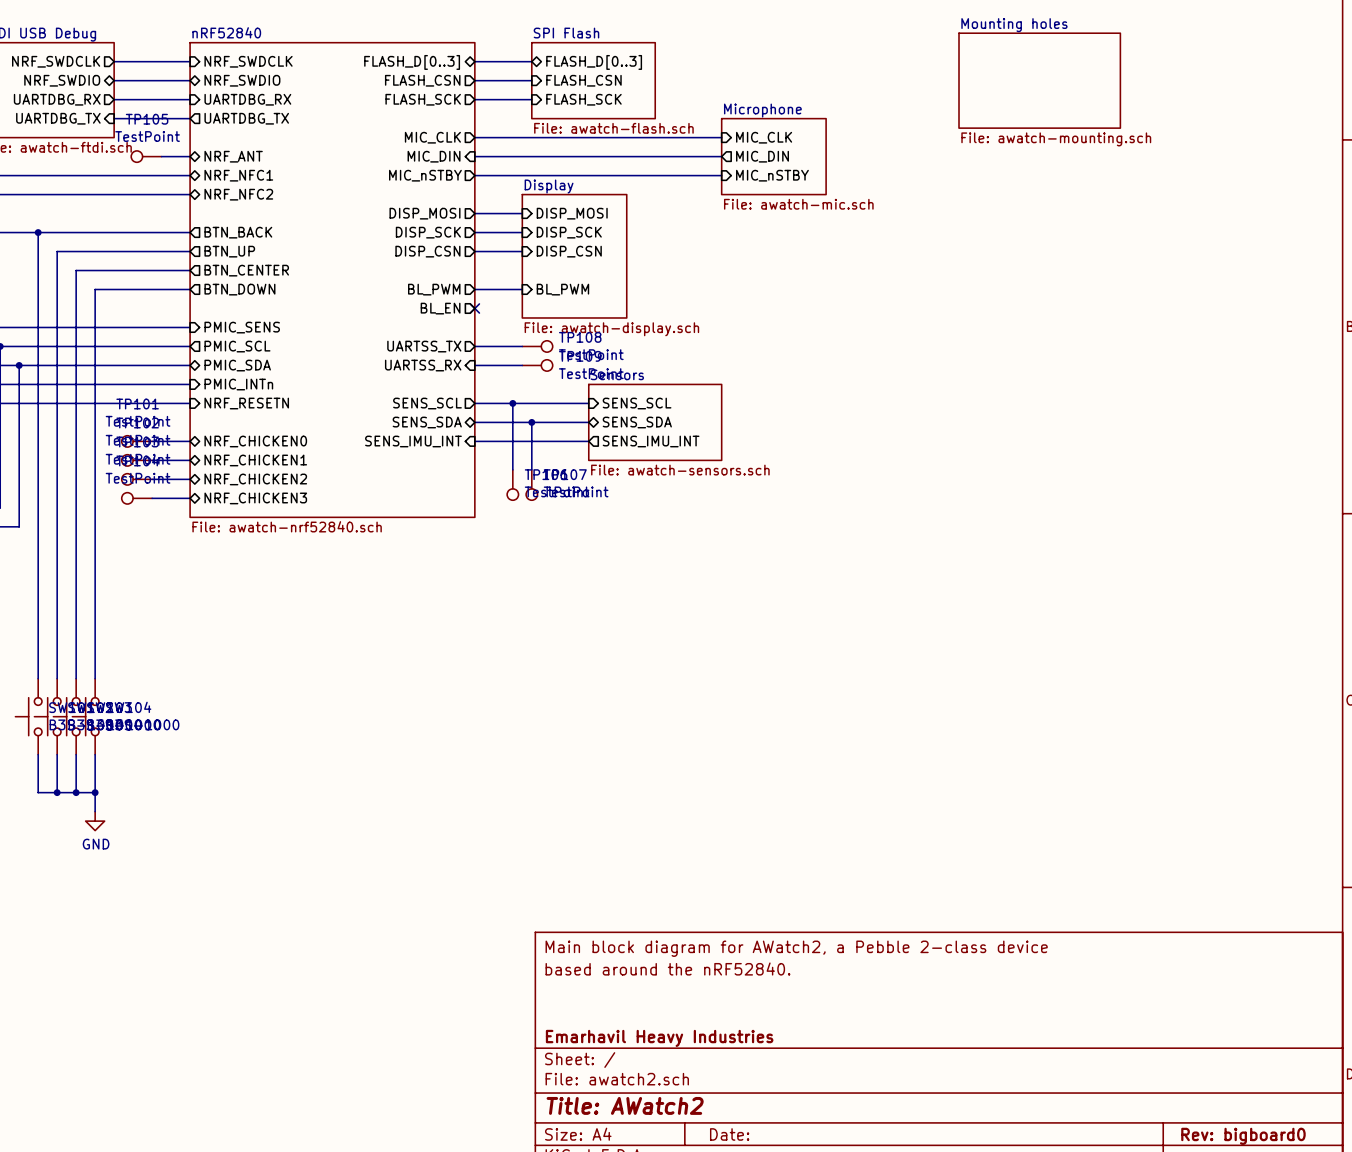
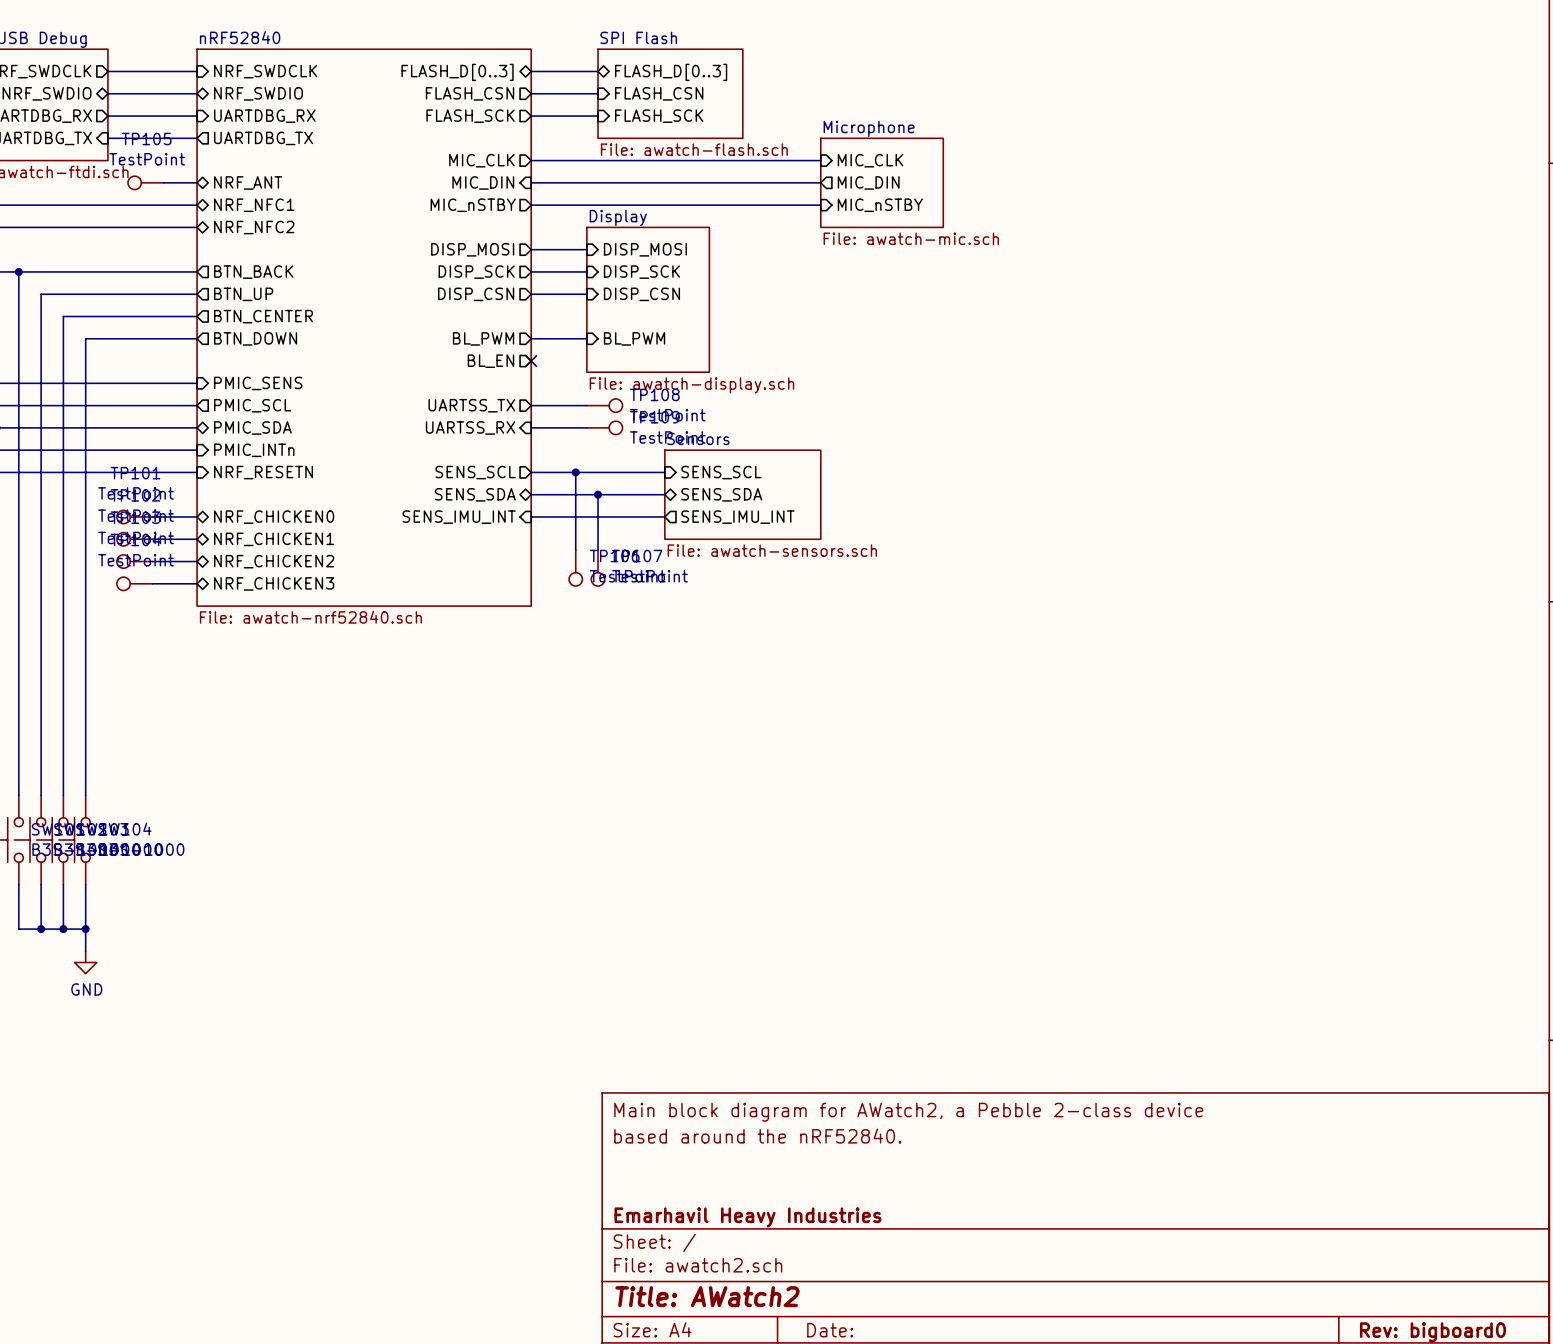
sheet Mounting holes: File: awatch-mounting.sch (1039, 80) -> none

